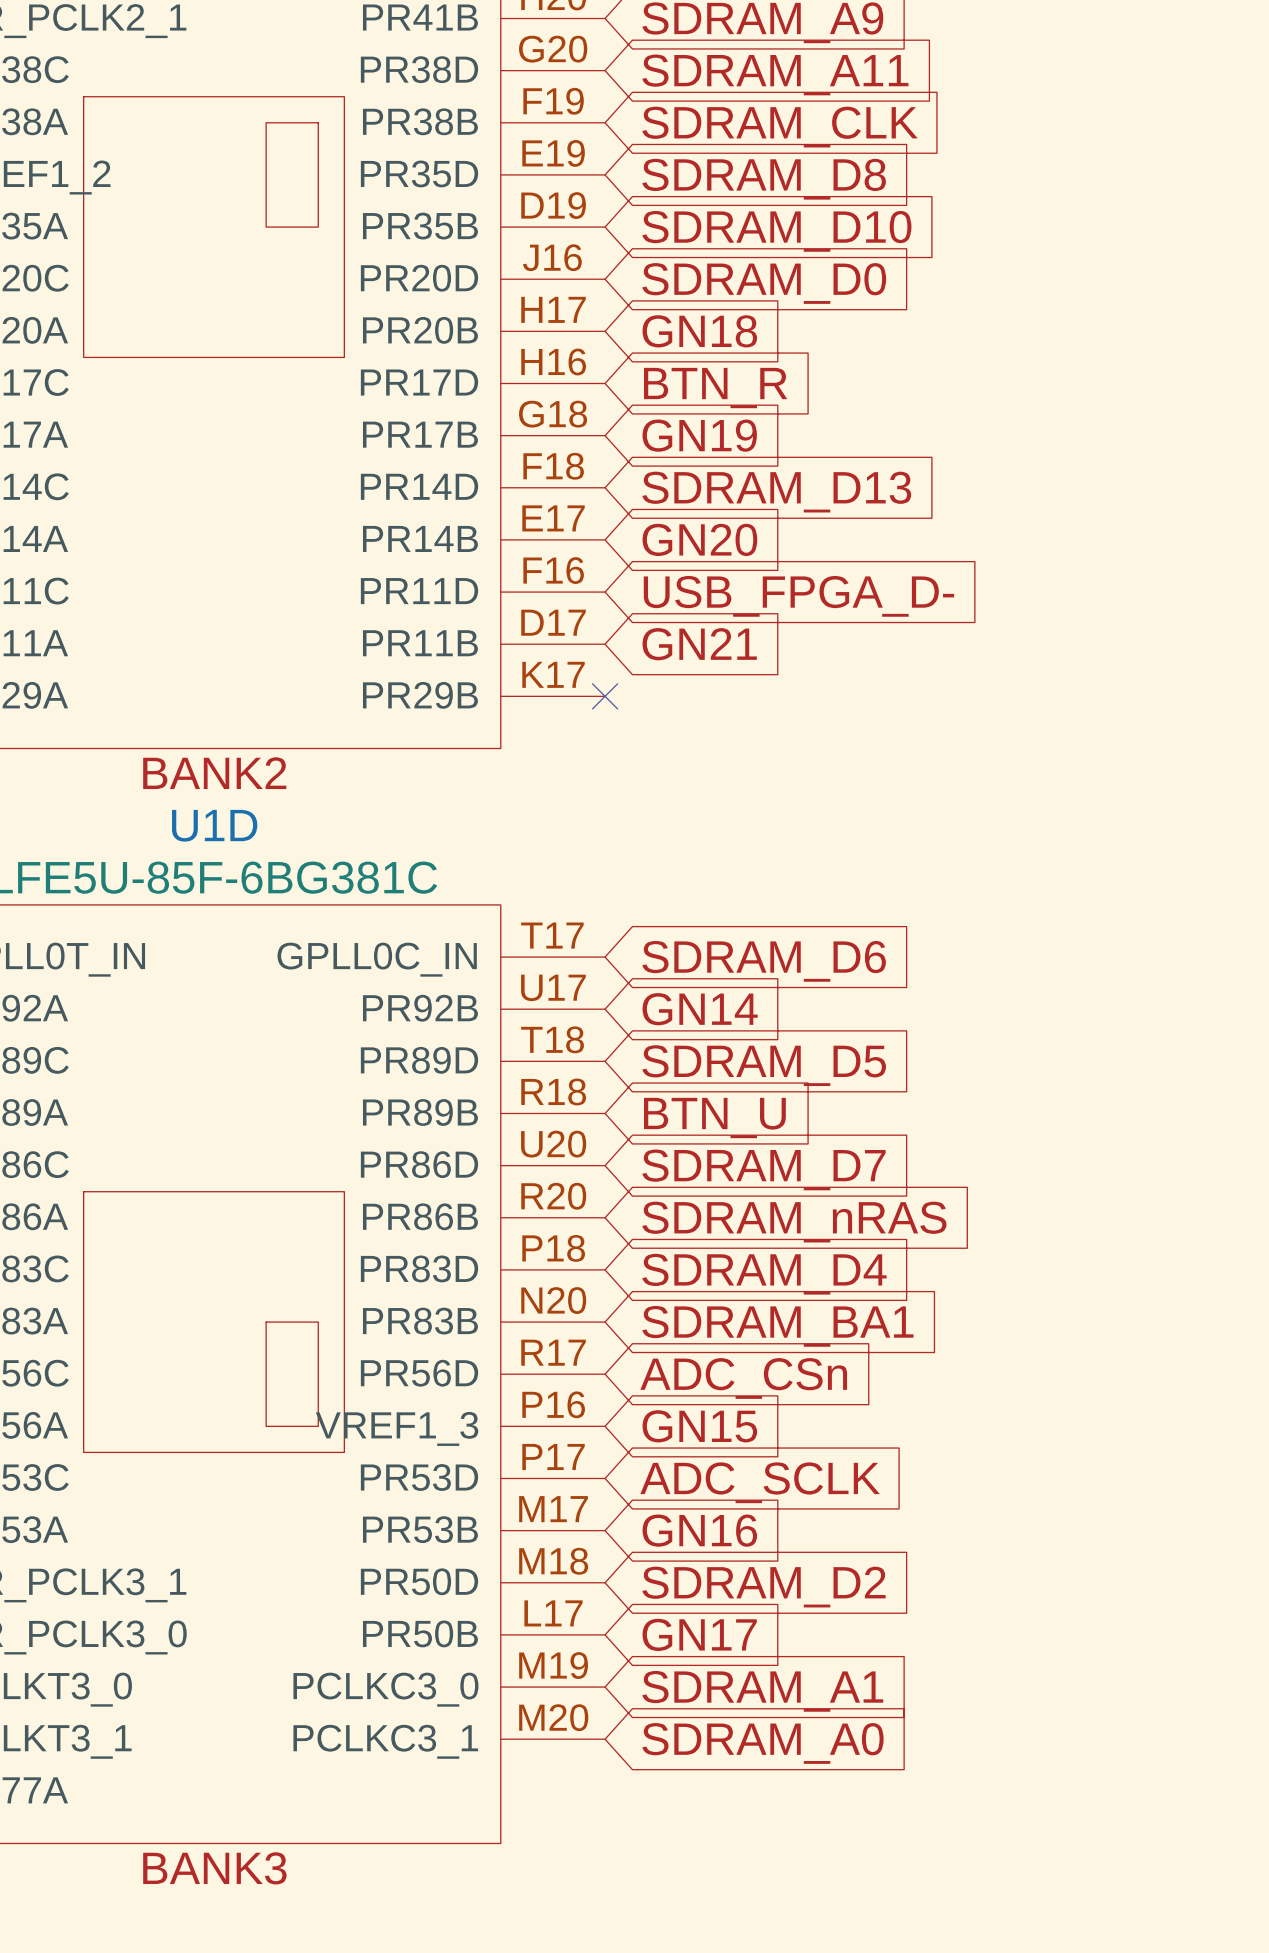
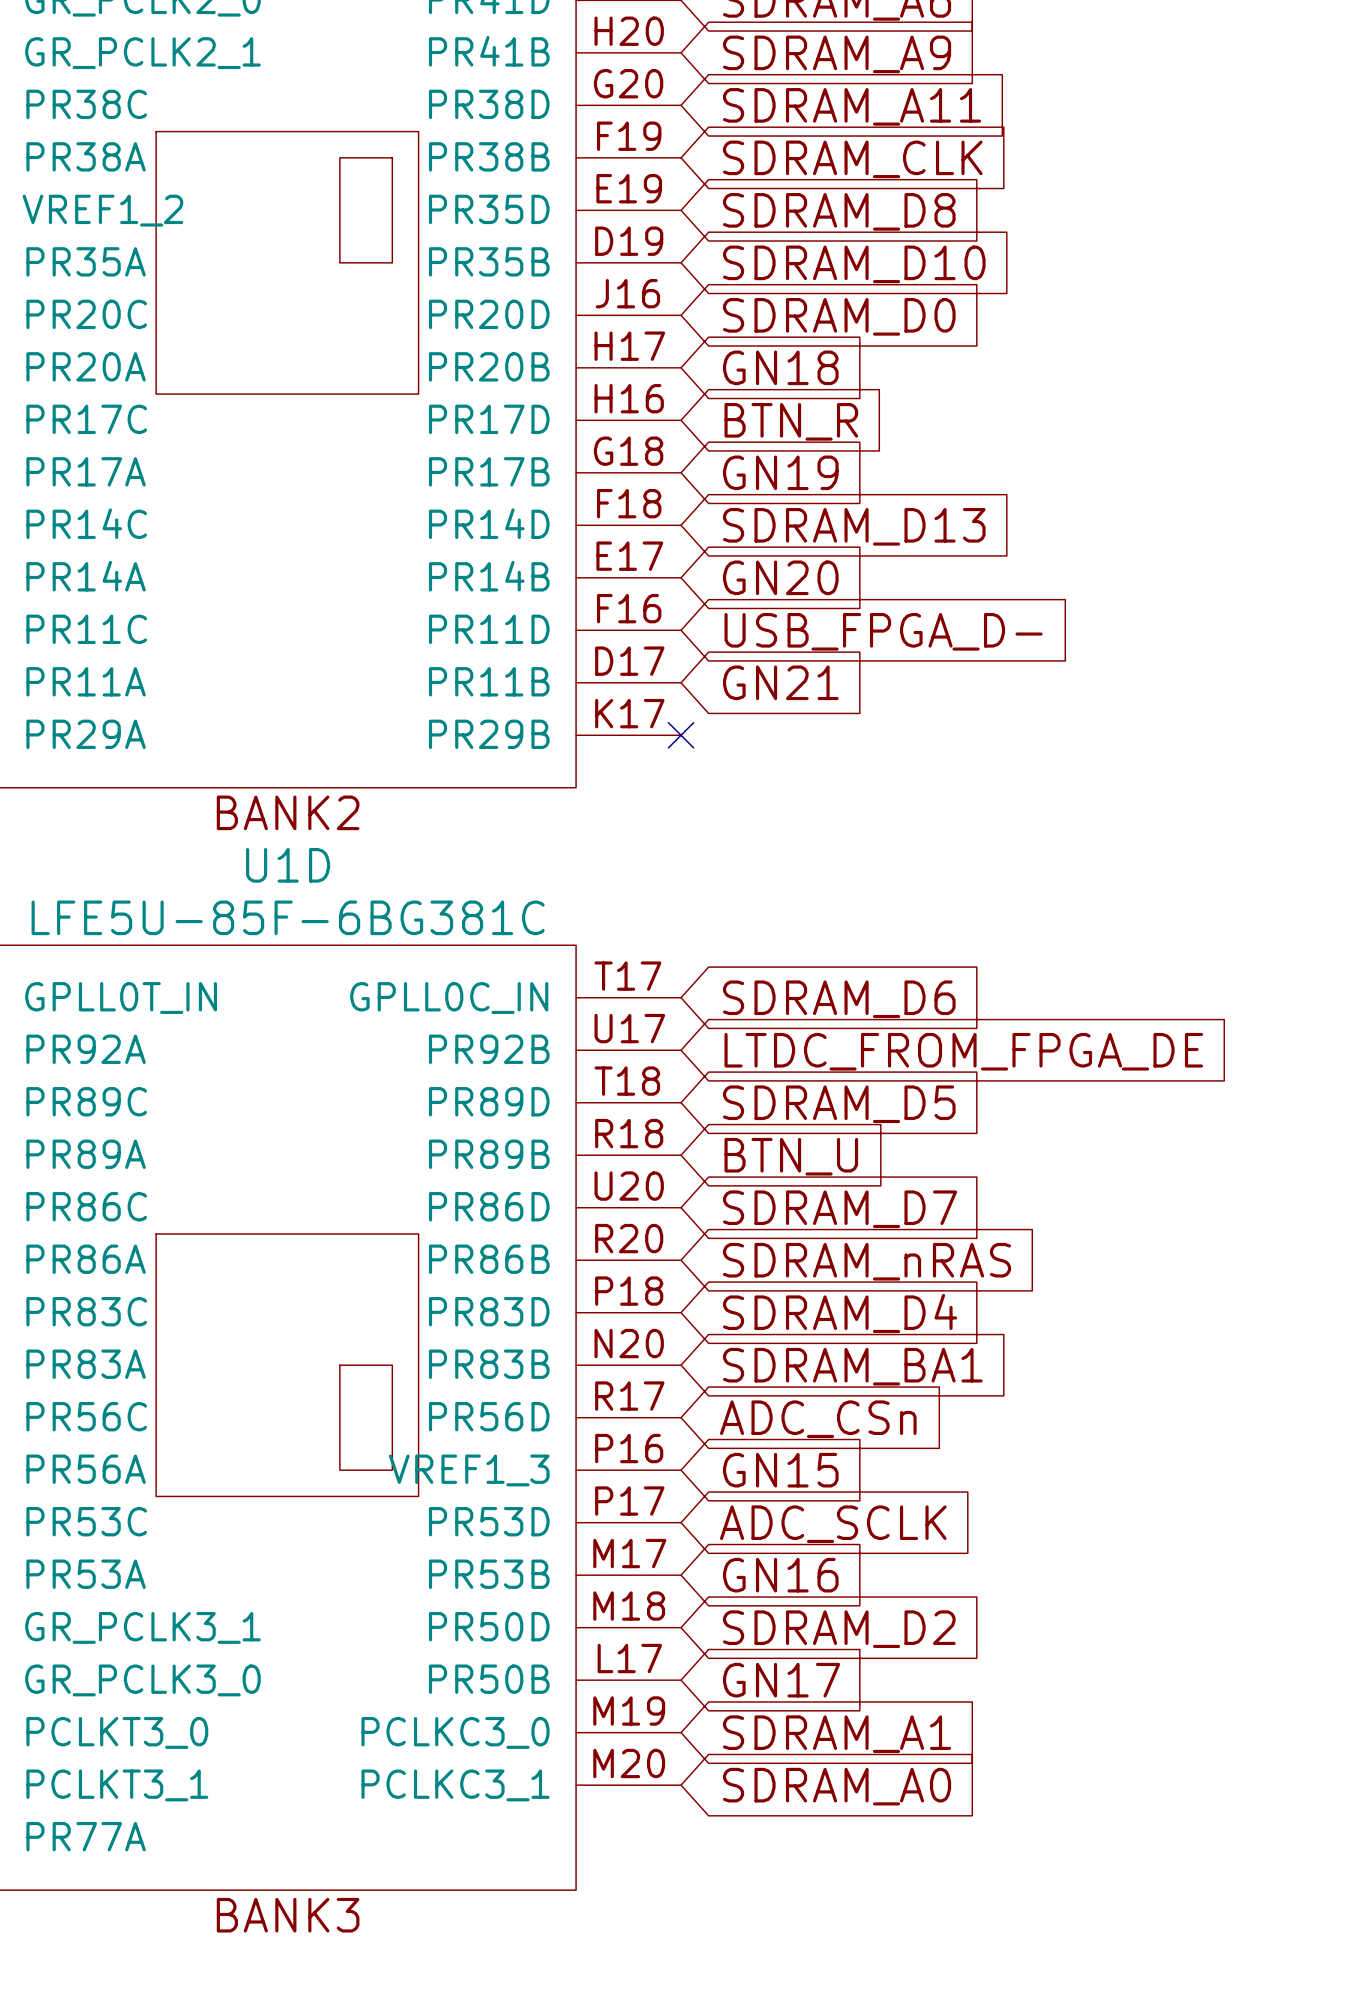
global label: GN14 (700, 1009) -> LTDC_FROM_FPGA_DE (963, 1051)

